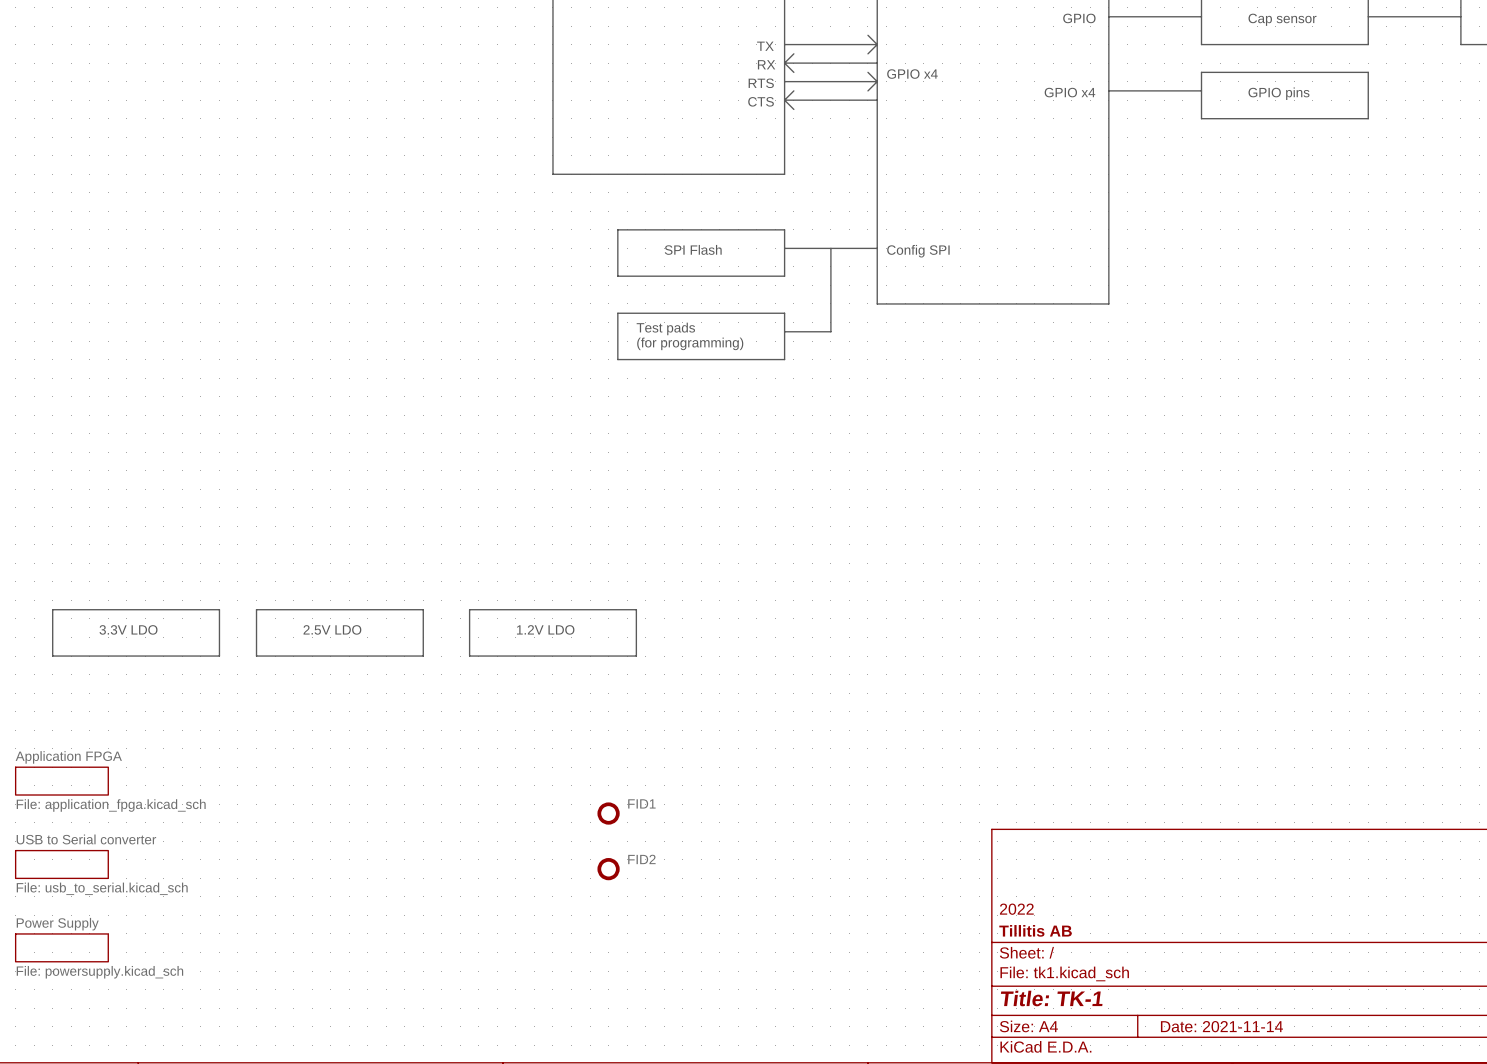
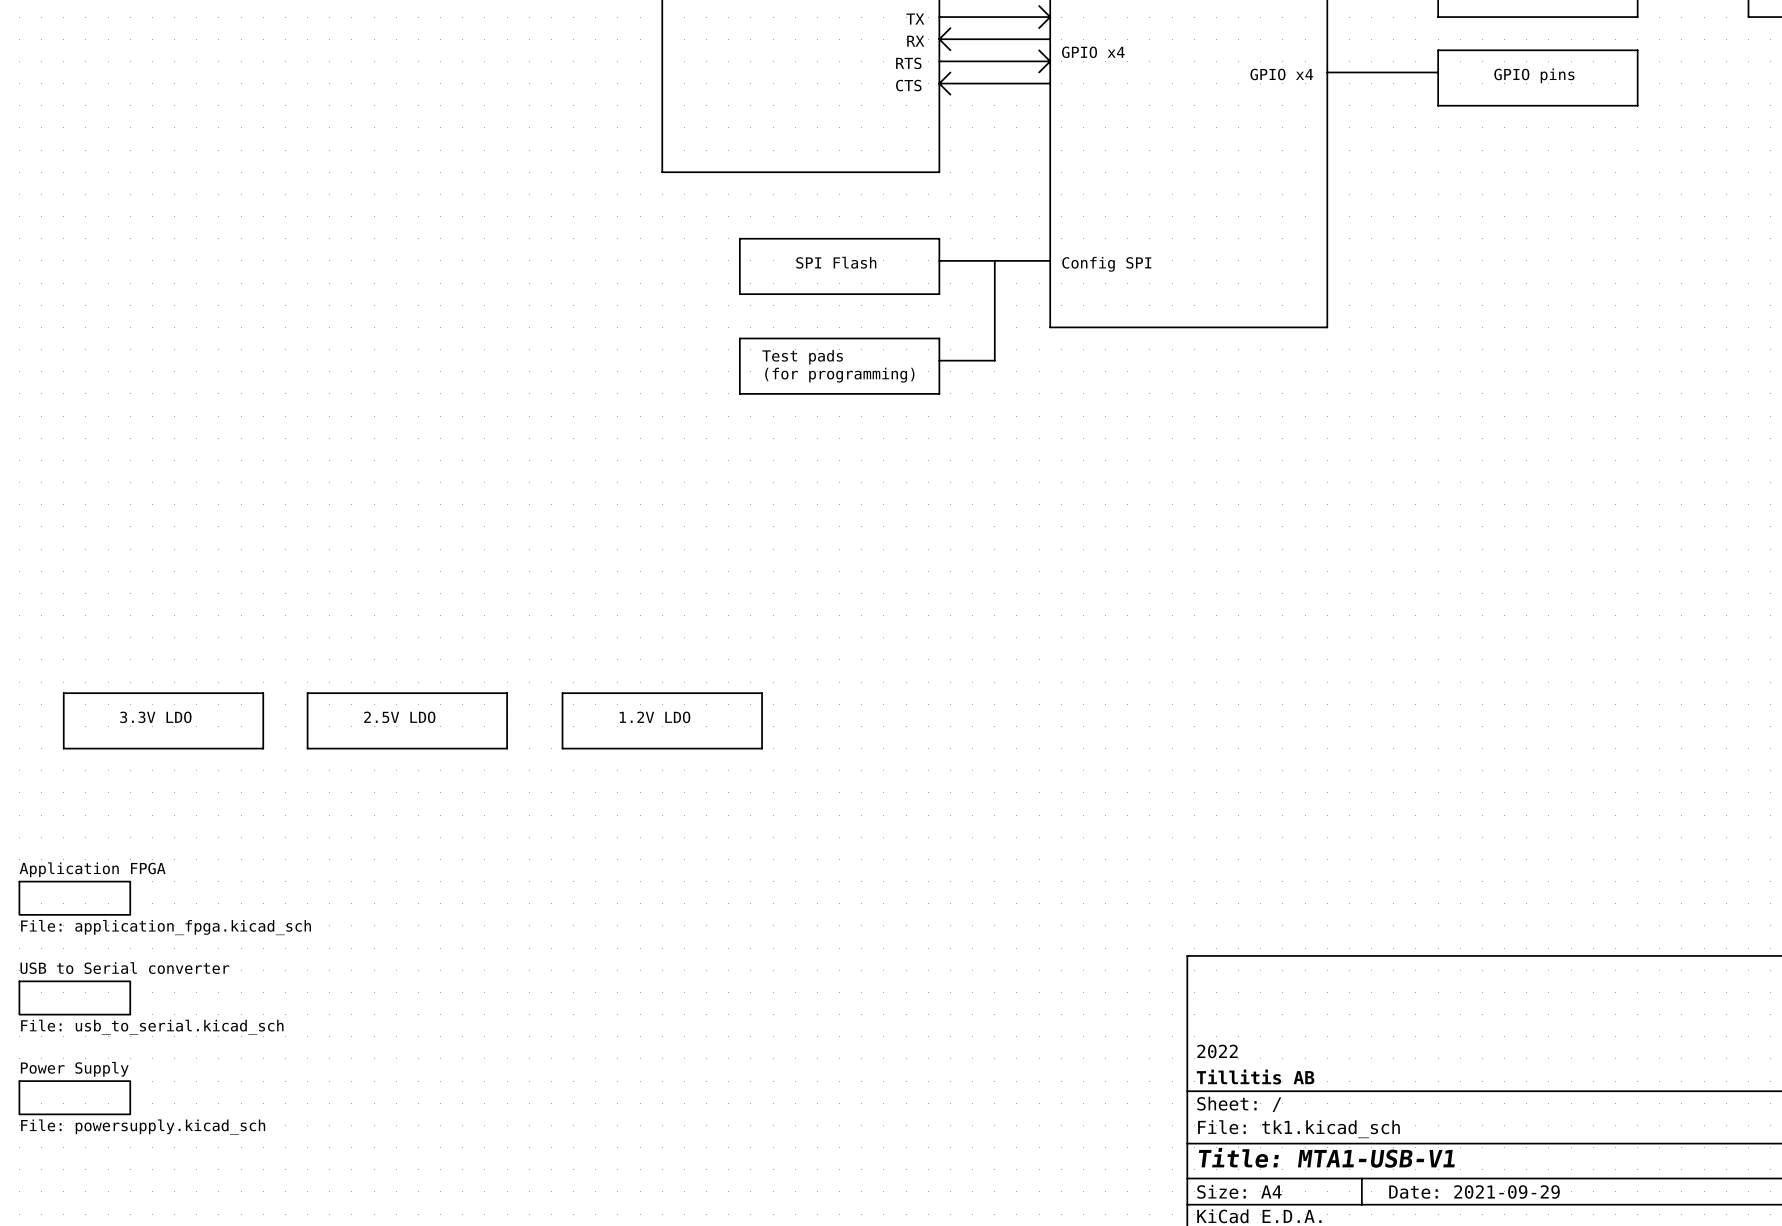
FID1: (608, 813) -> none
FID2: (608, 869) -> none
title block: Title: TK-1 (1051, 998) -> Title: MTA1-USB-V1 (1326, 1157)
title block: Date: 2021-11-14 (1221, 1026) -> Date: 2021-09-29 (1474, 1191)

